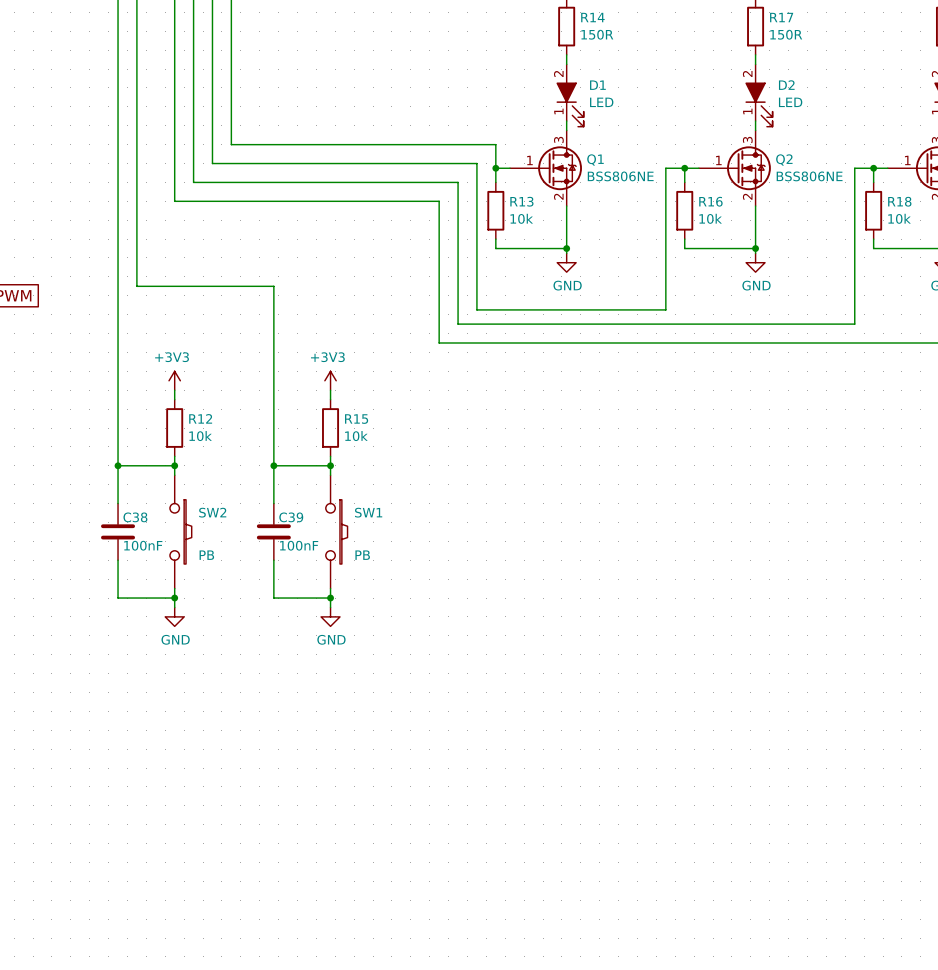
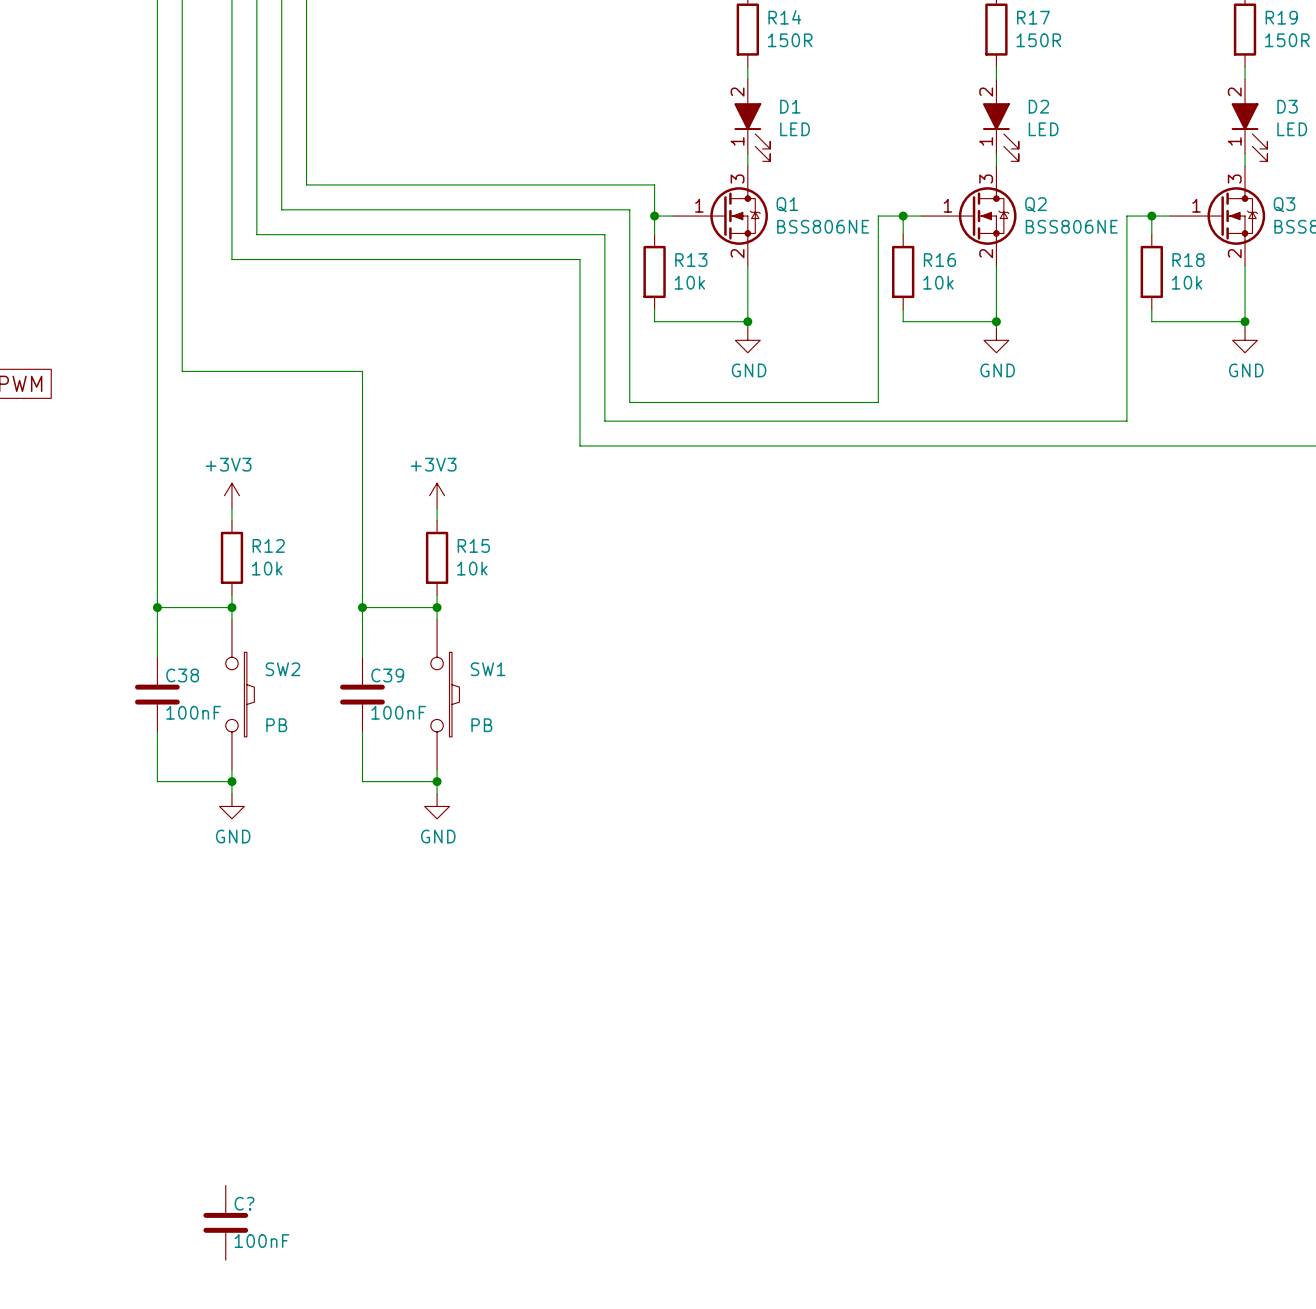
C?: none -> 100nF (225, 1222)

